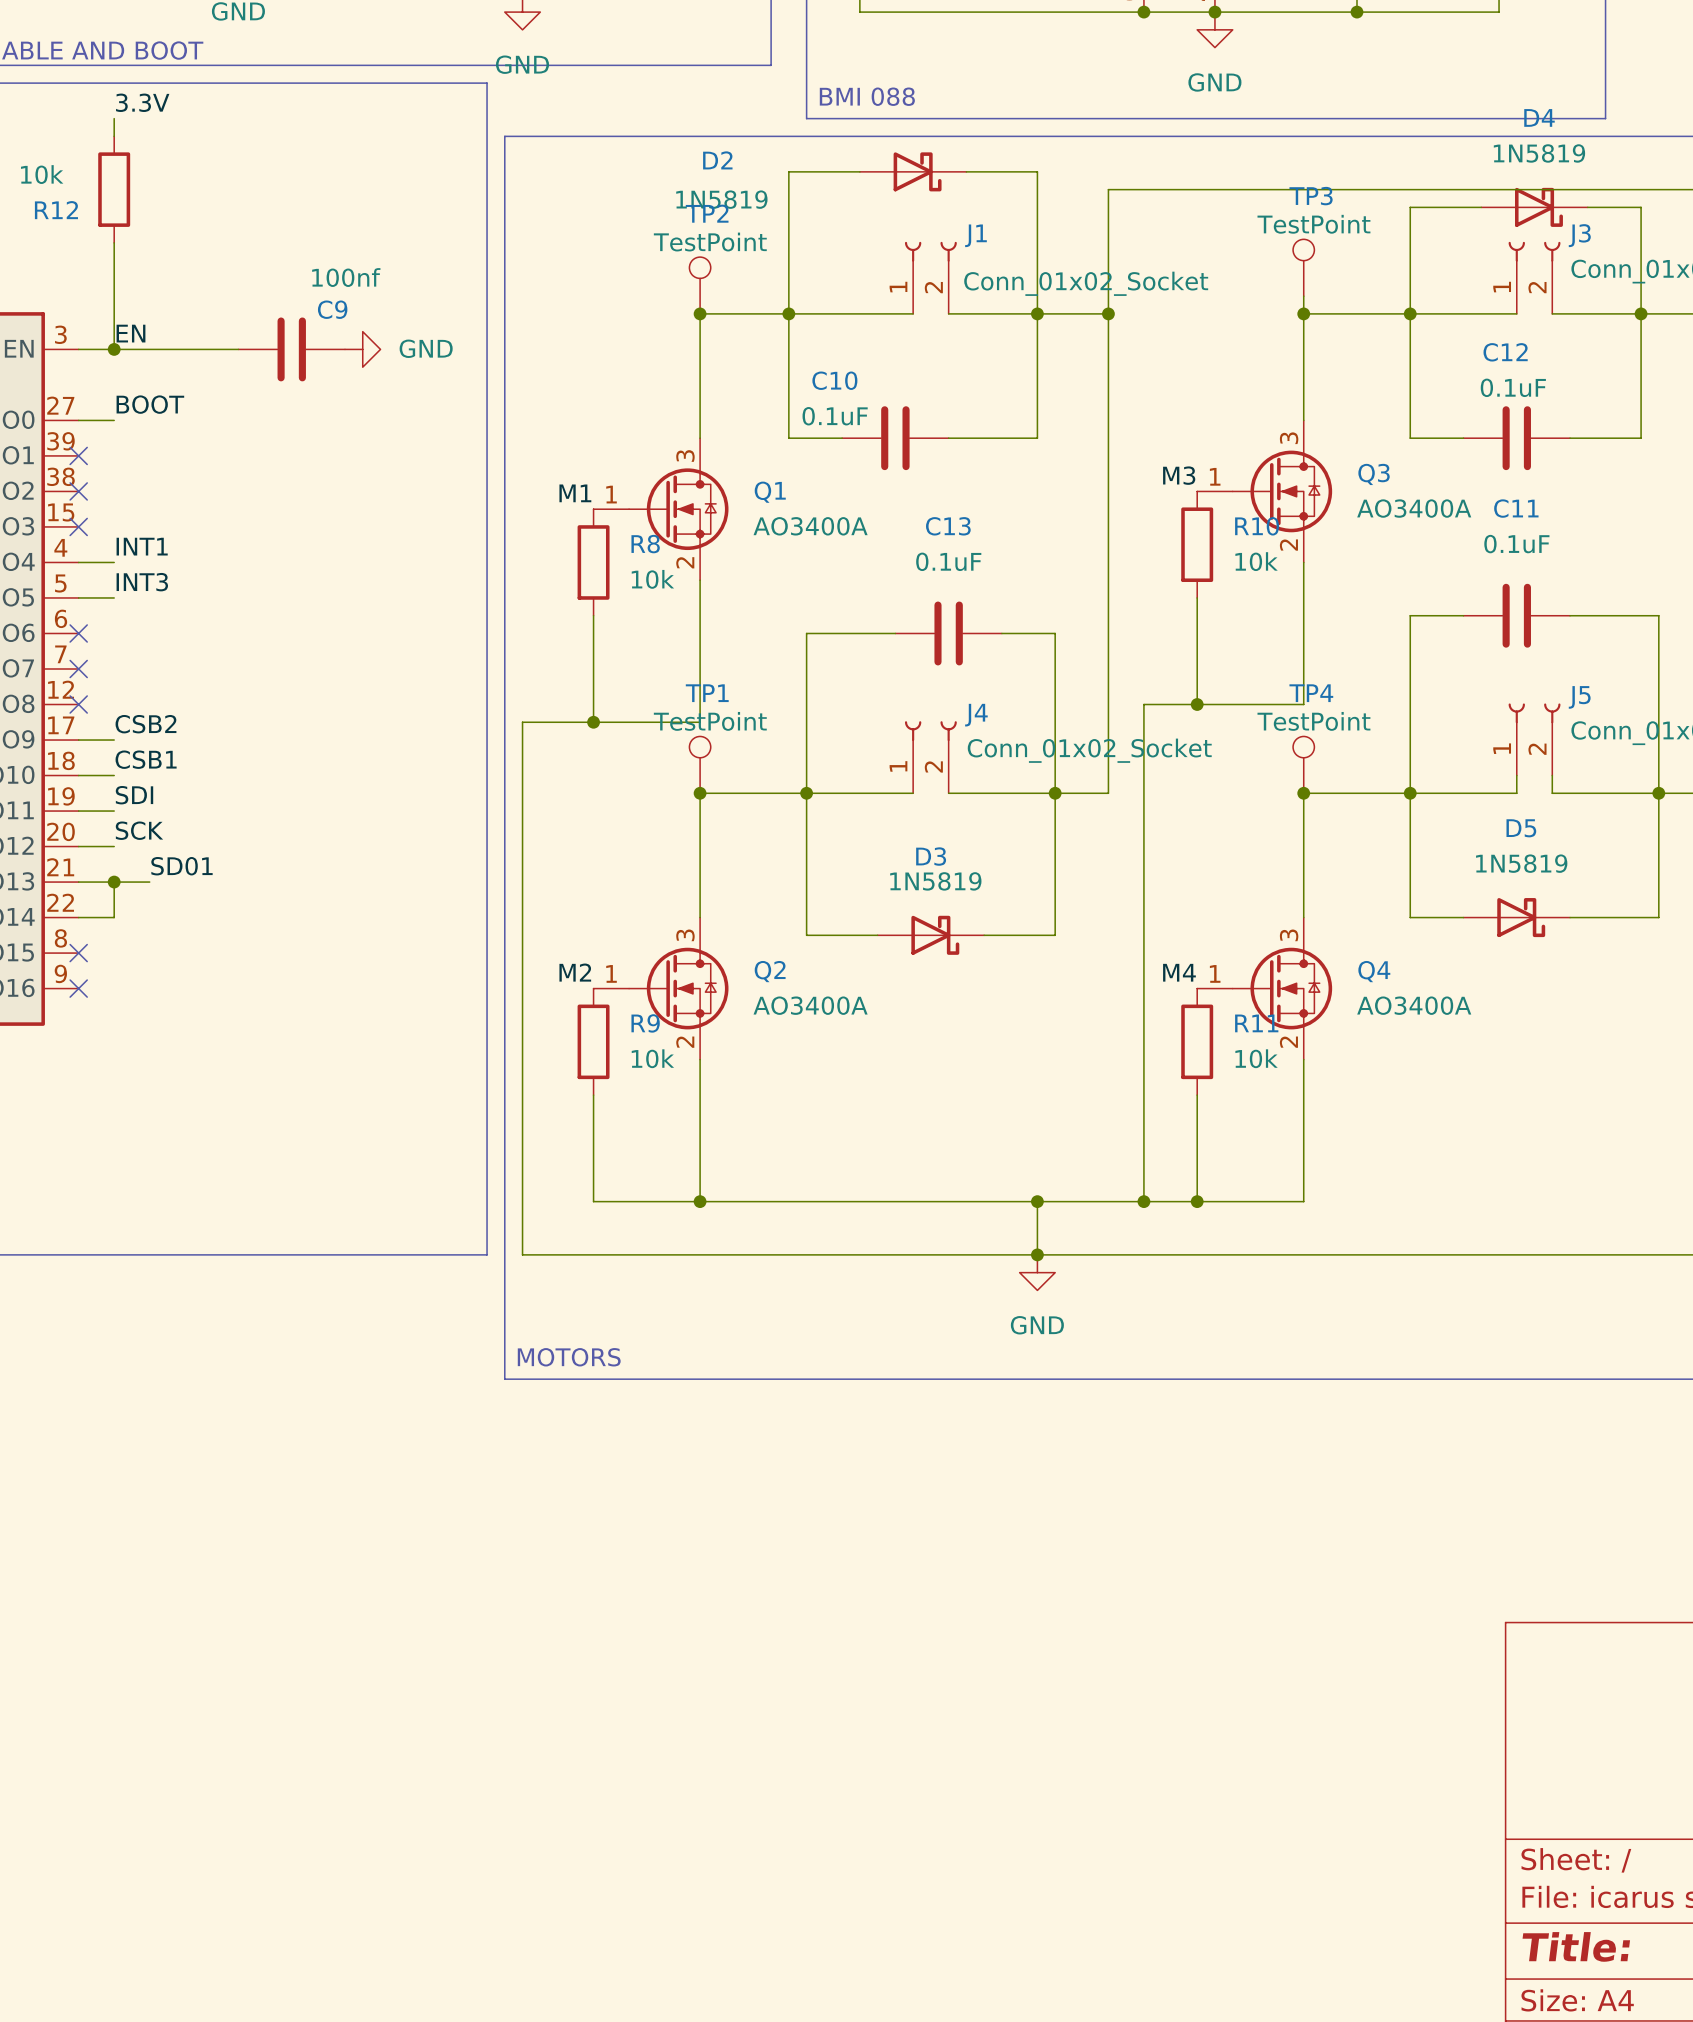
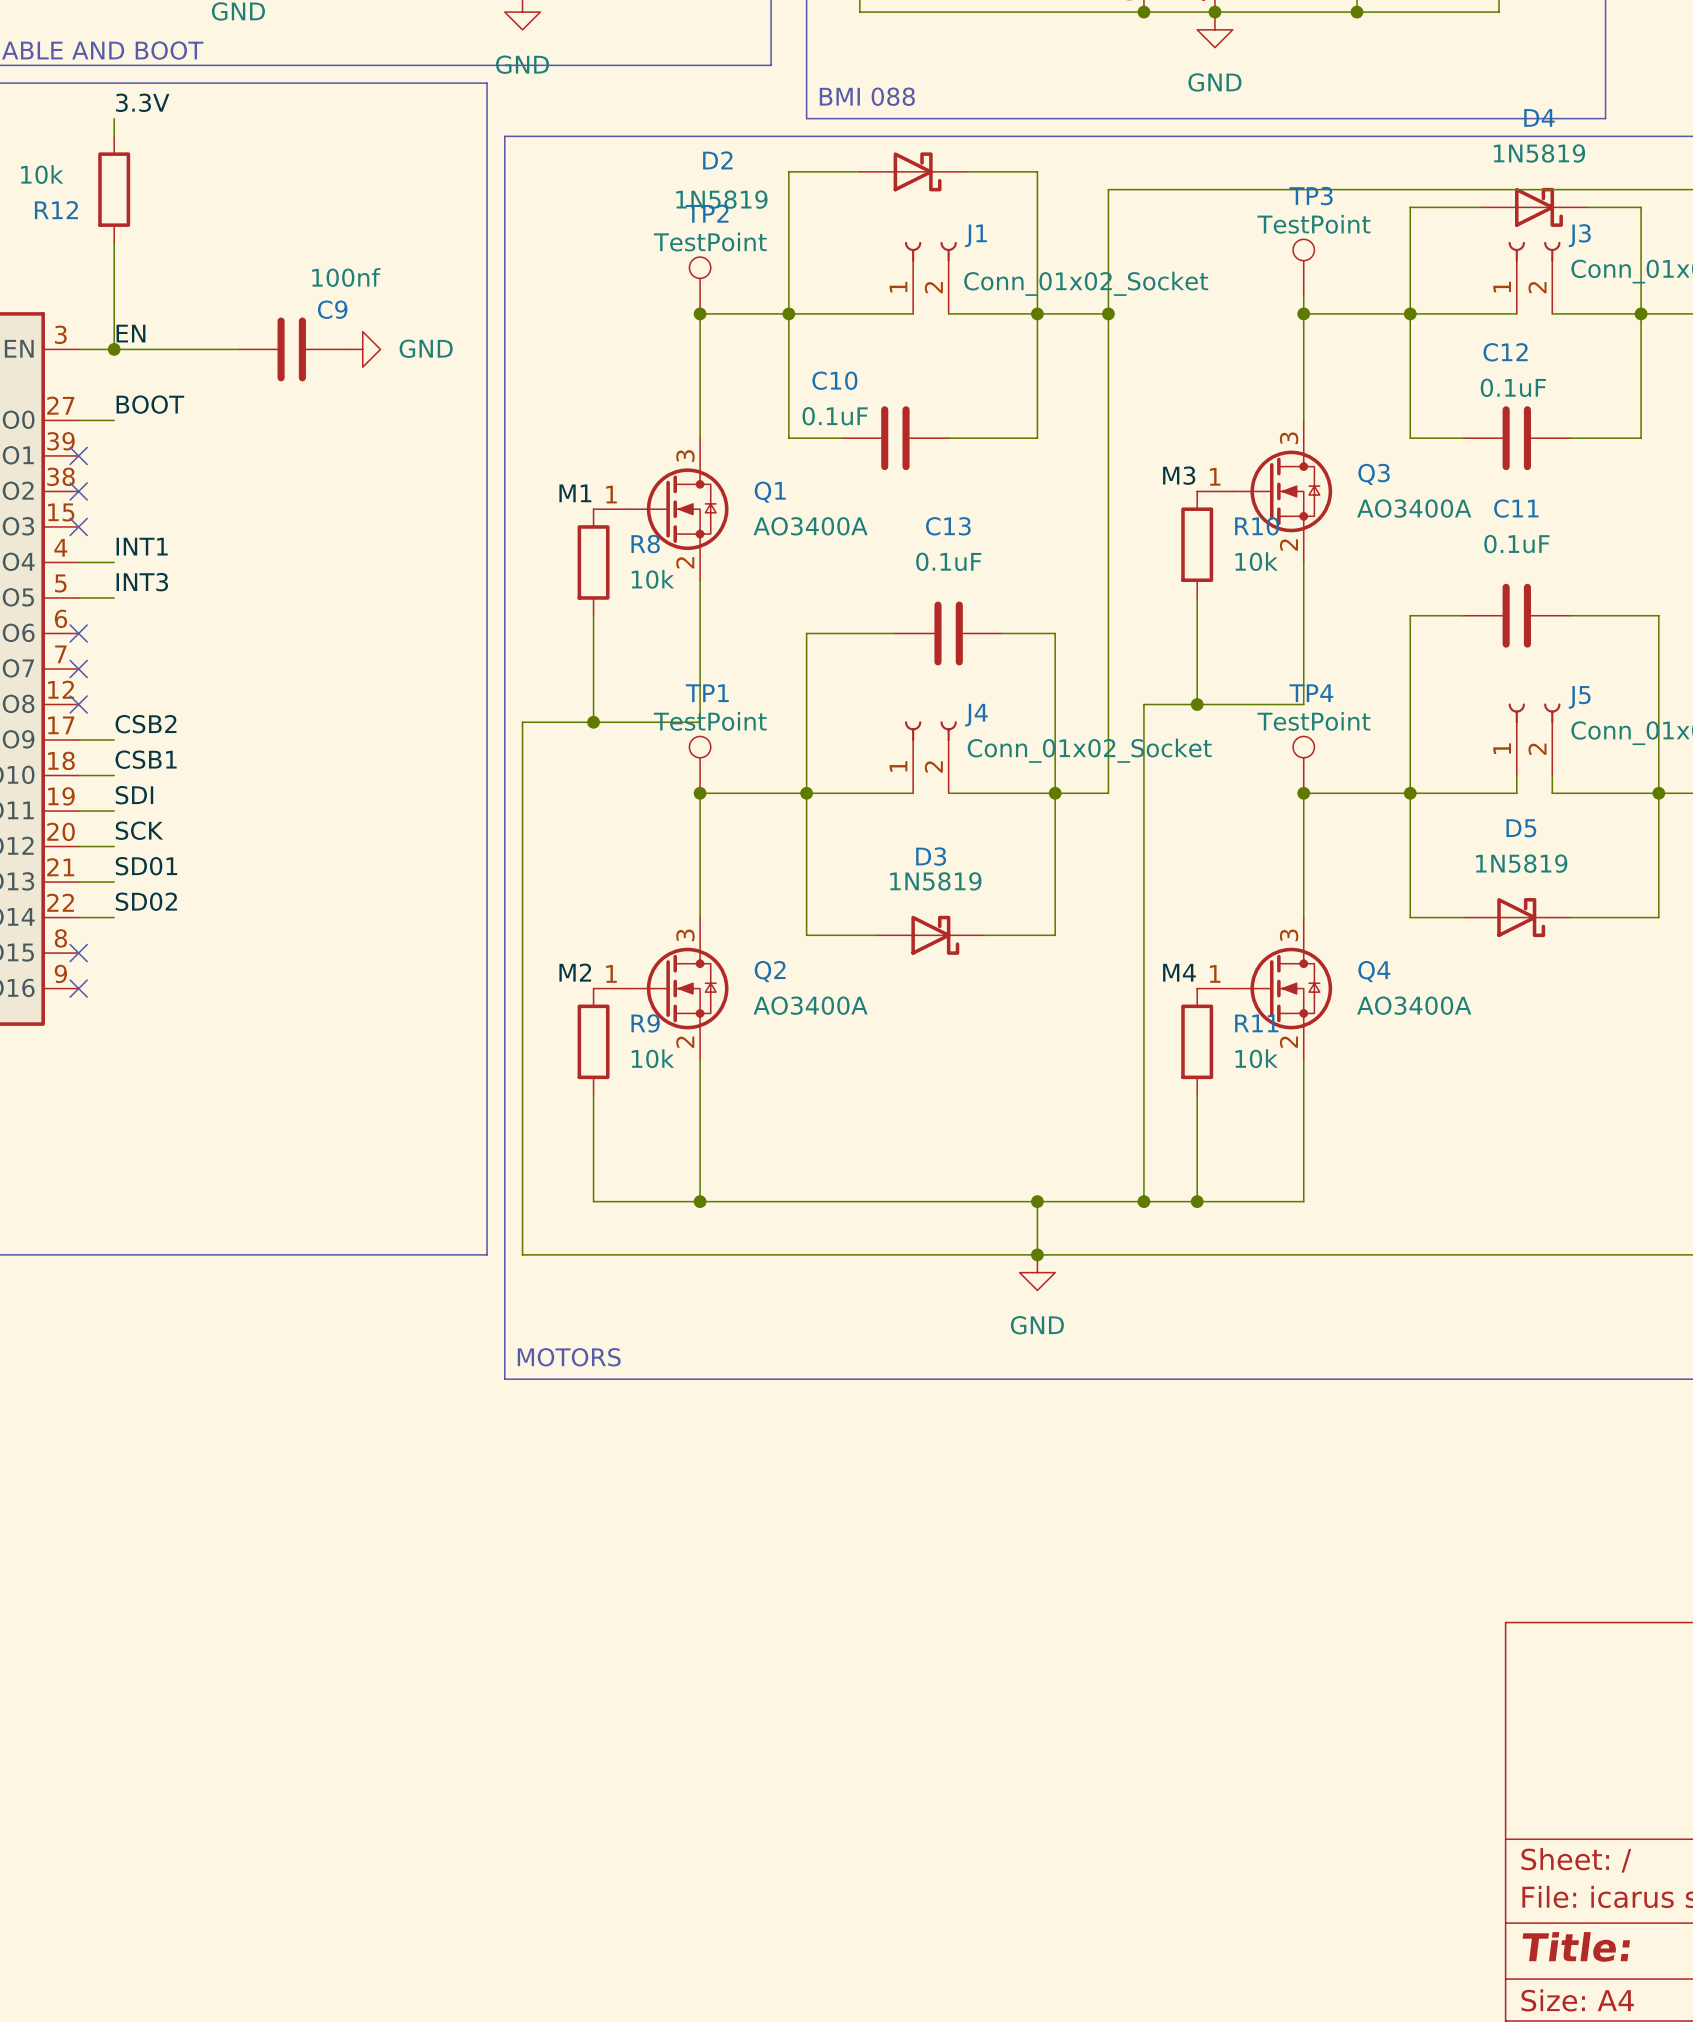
label position: SD01 (181, 866) -> SD01 (146, 866)
junction: (114, 882) -> none
wire: (149, 882) (114, 882) (114, 917) -> none
label: none -> SD02 (146, 901)

